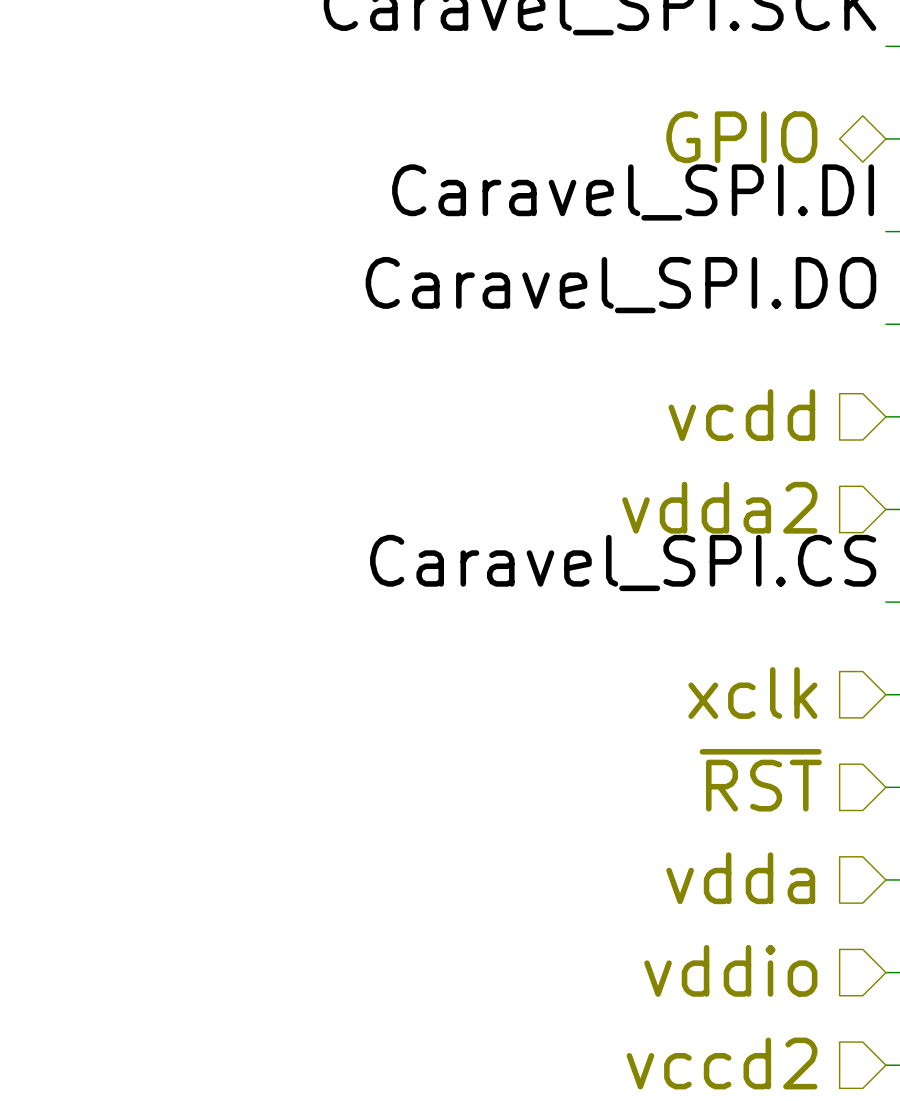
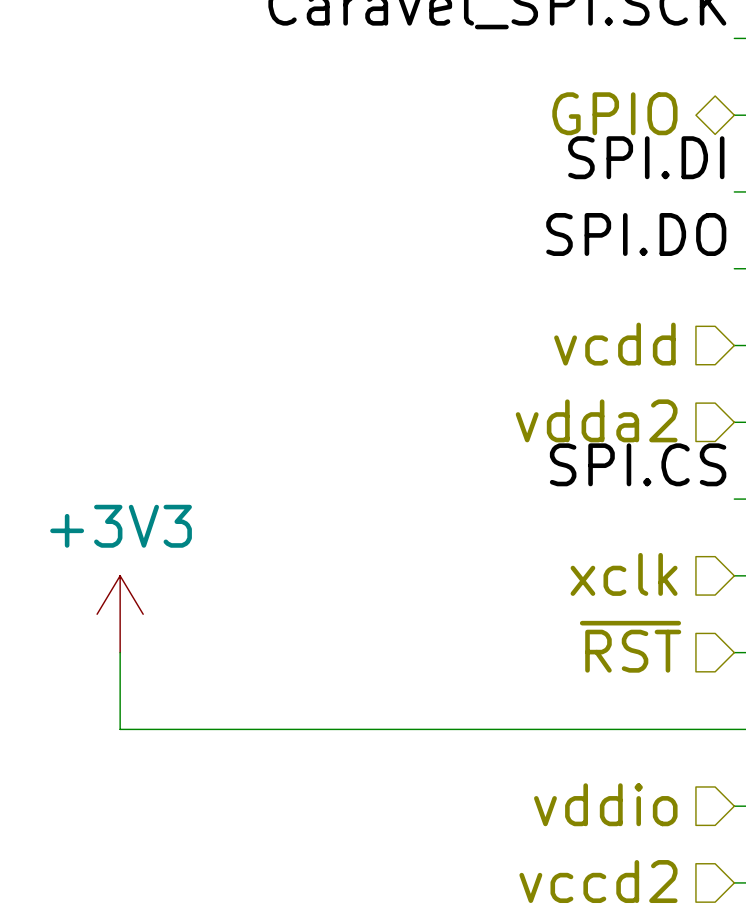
label: Caravel_SPI.DI (633, 192) -> SPI.DI (646, 157)
label: Caravel_SPI.DO (620, 285) -> SPI.DO (636, 234)
label: Caravel_SPI.CS (623, 562) -> SPI.CS (638, 464)
power symbol: none -> +3V3 (120, 614)
wire: none -> (120, 652) (120, 729) (734, 729)
hierarchical label: vdda (740, 878) -> none

